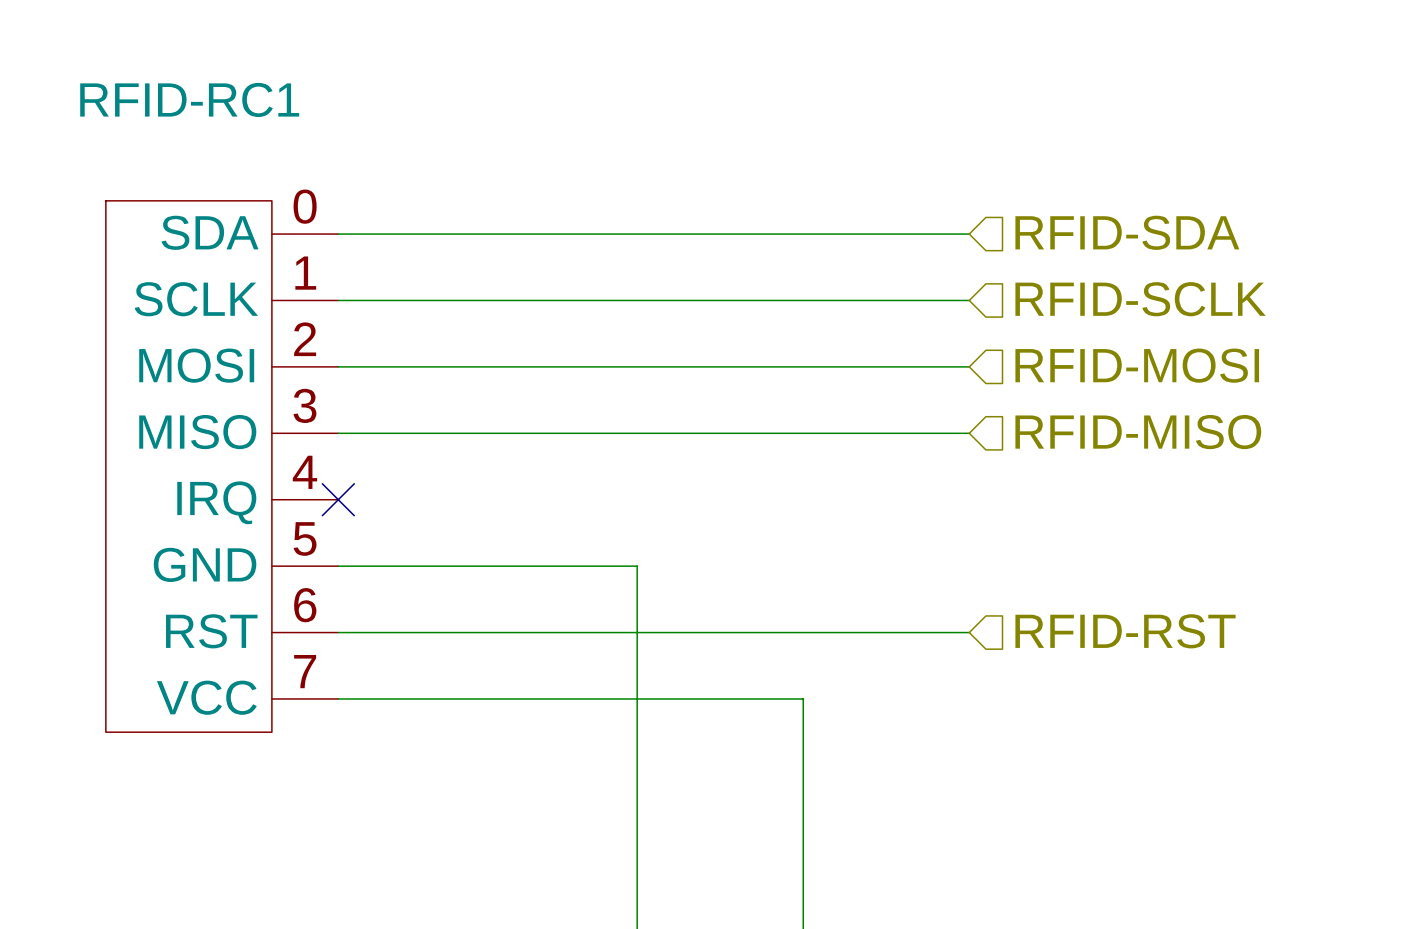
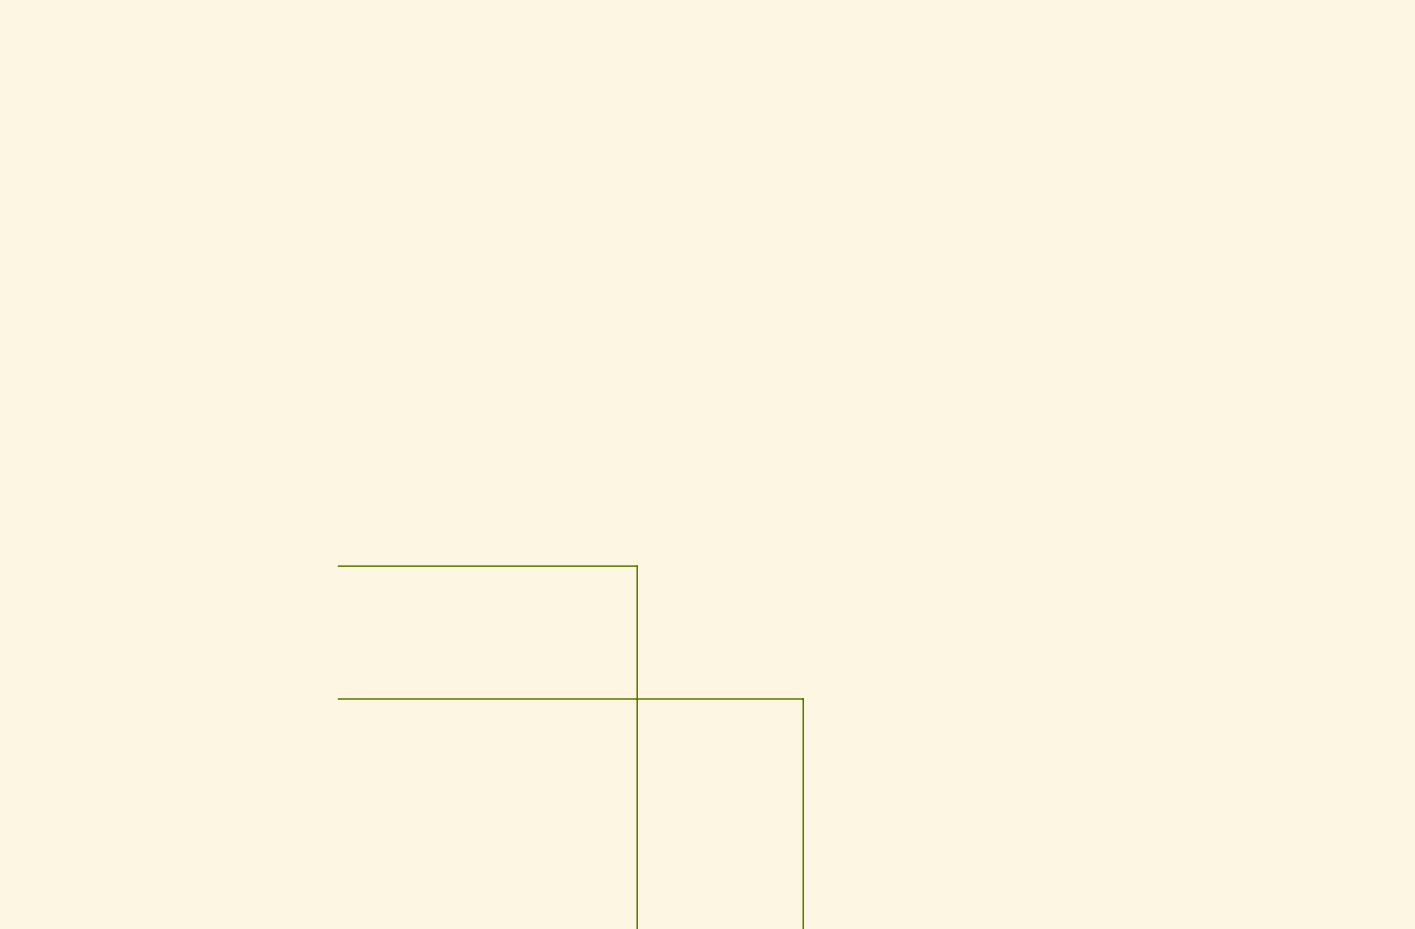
hierarchical label: RFID-SDA (1127, 232) -> none
wire: (338, 234) (969, 234) -> none
hierarchical label: RFID-SCLK (1140, 299) -> none
wire: (338, 300) (969, 300) -> none
hierarchical label: RFID-MOSI (1137, 365) -> none
wire: (338, 366) (969, 366) -> none
hierarchical label: RFID-MISO (1138, 432) -> none
wire: (338, 433) (969, 433) -> none
RFID-RC1: (222, 466) -> none
no-connect mark: (338, 499) -> none
hierarchical label: RFID-RST (1125, 631) -> none
wire: (338, 632) (969, 632) -> none

